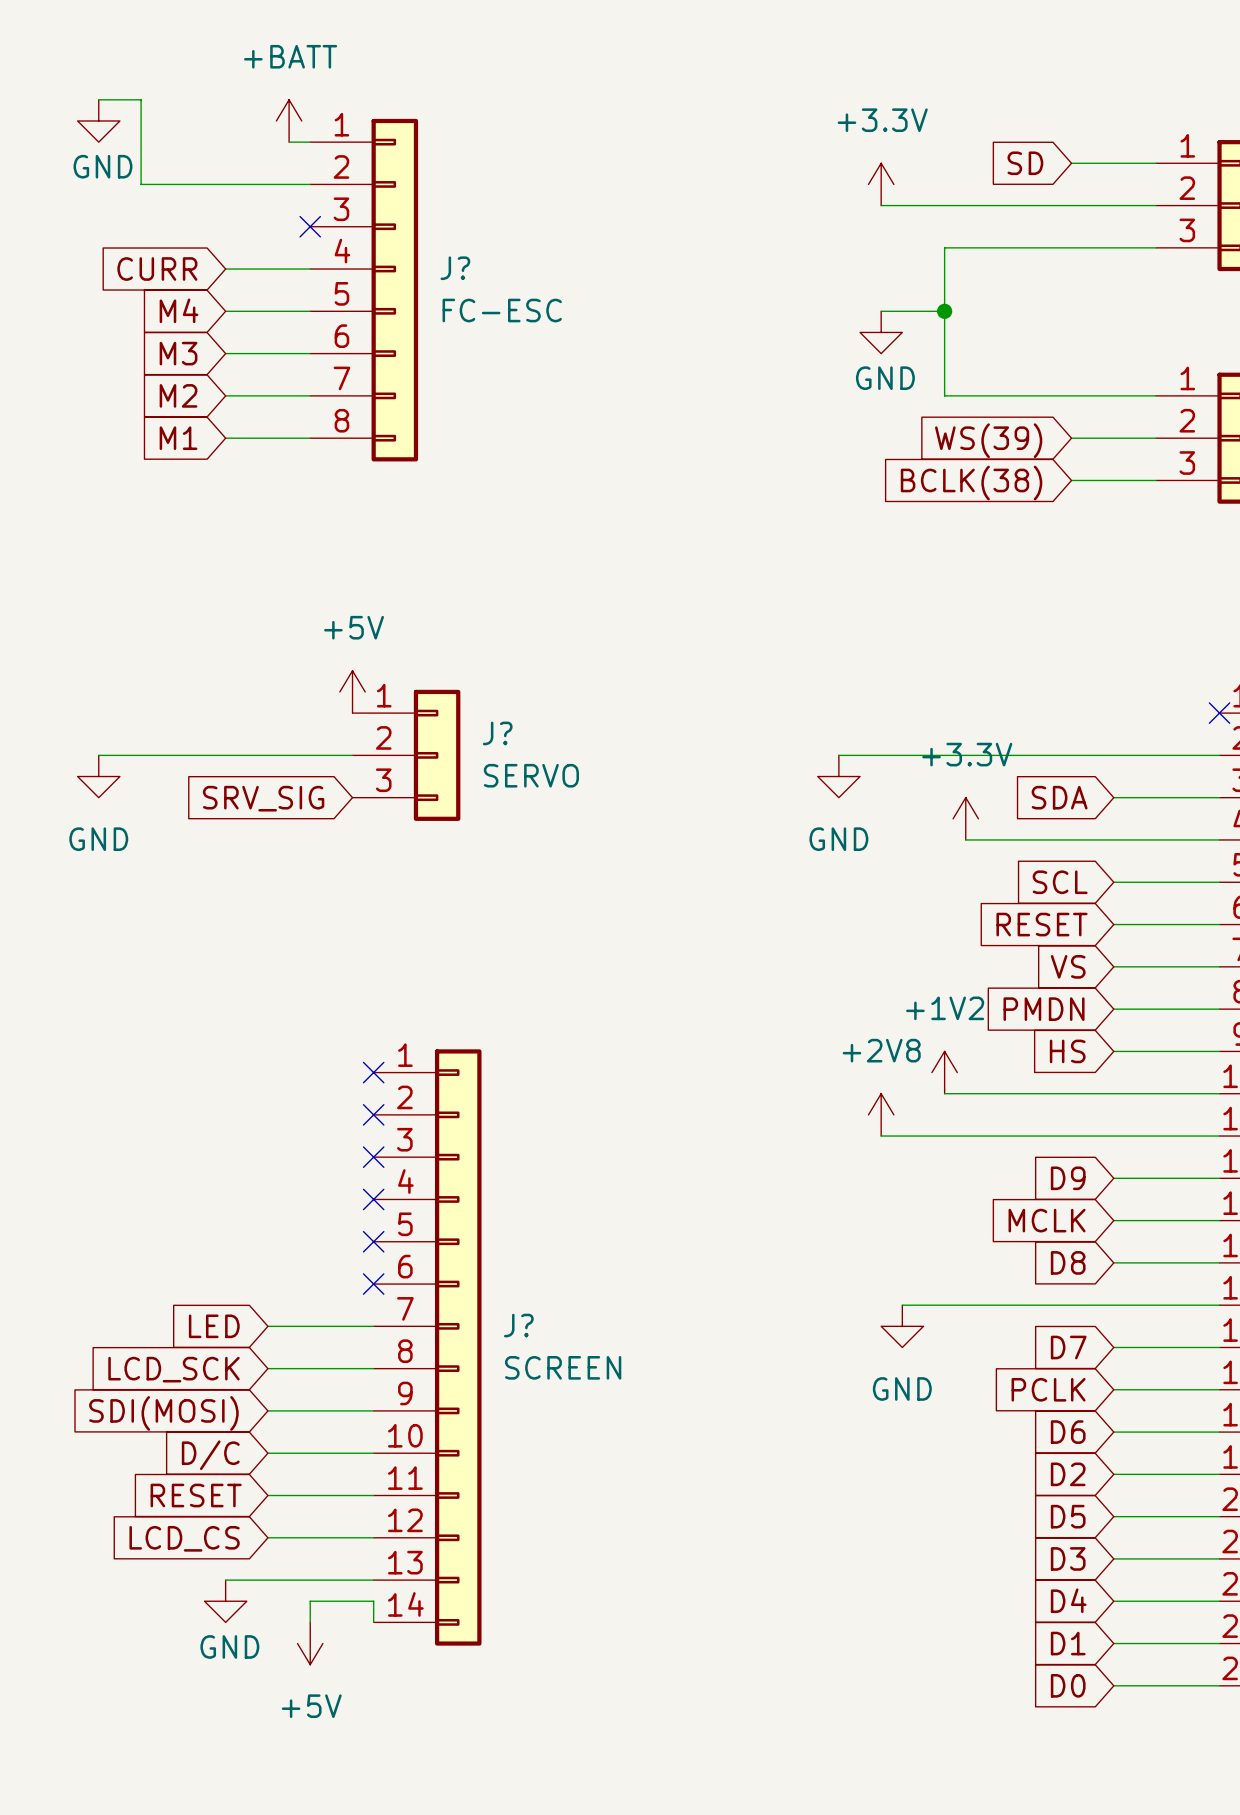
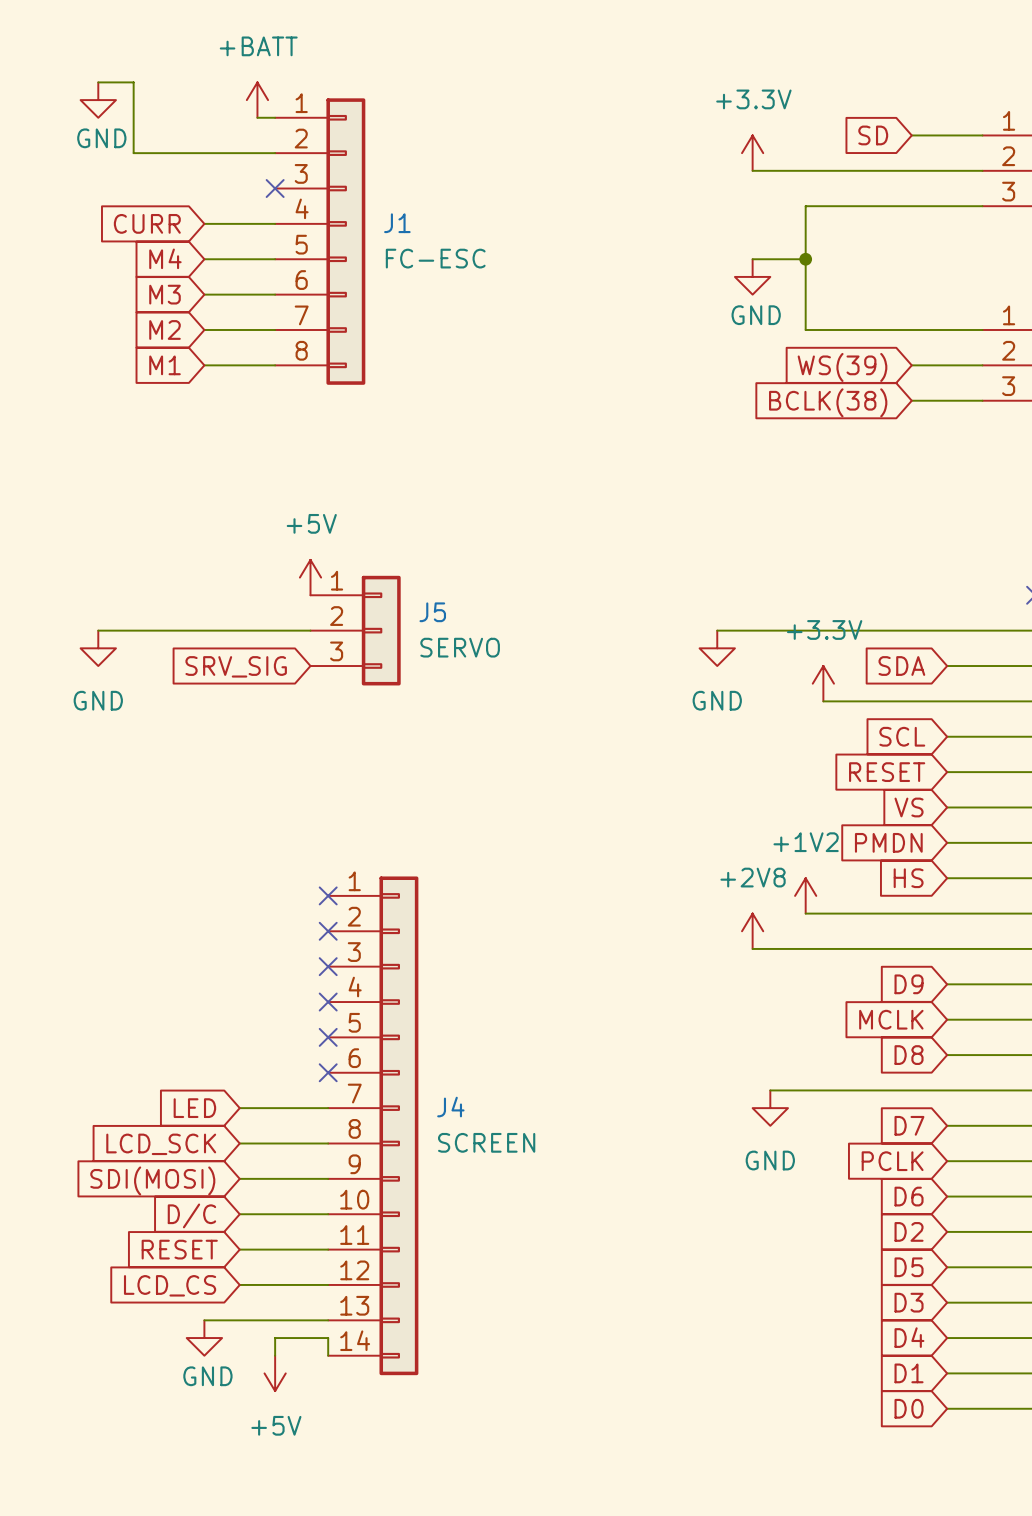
J? name: J? (455, 268) -> J1 (397, 223)
J? name: J? (497, 733) -> J5 (432, 612)
J? name: J? (518, 1325) -> J4 (450, 1107)

